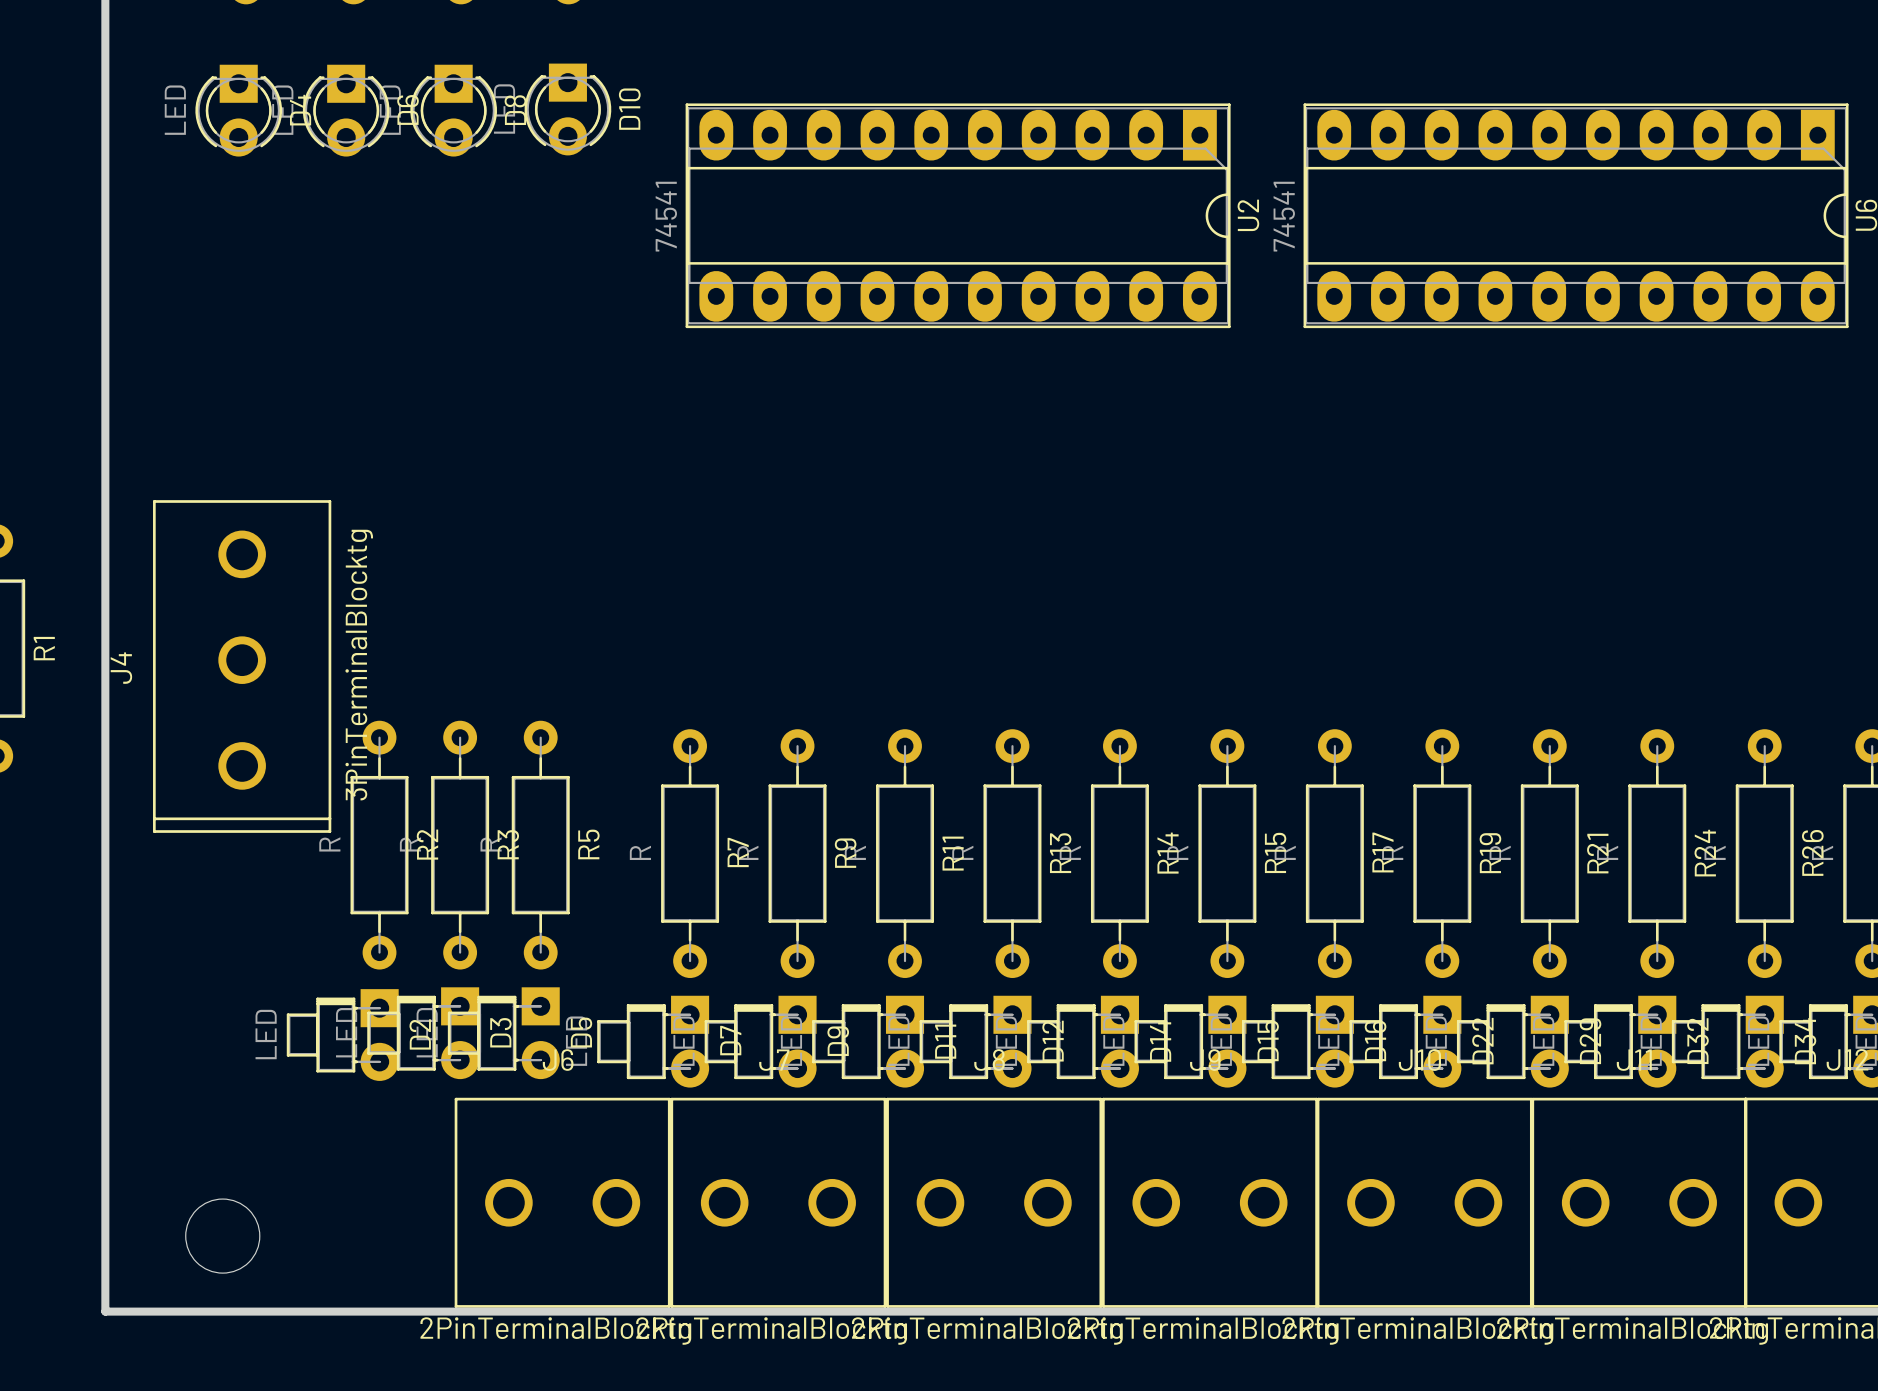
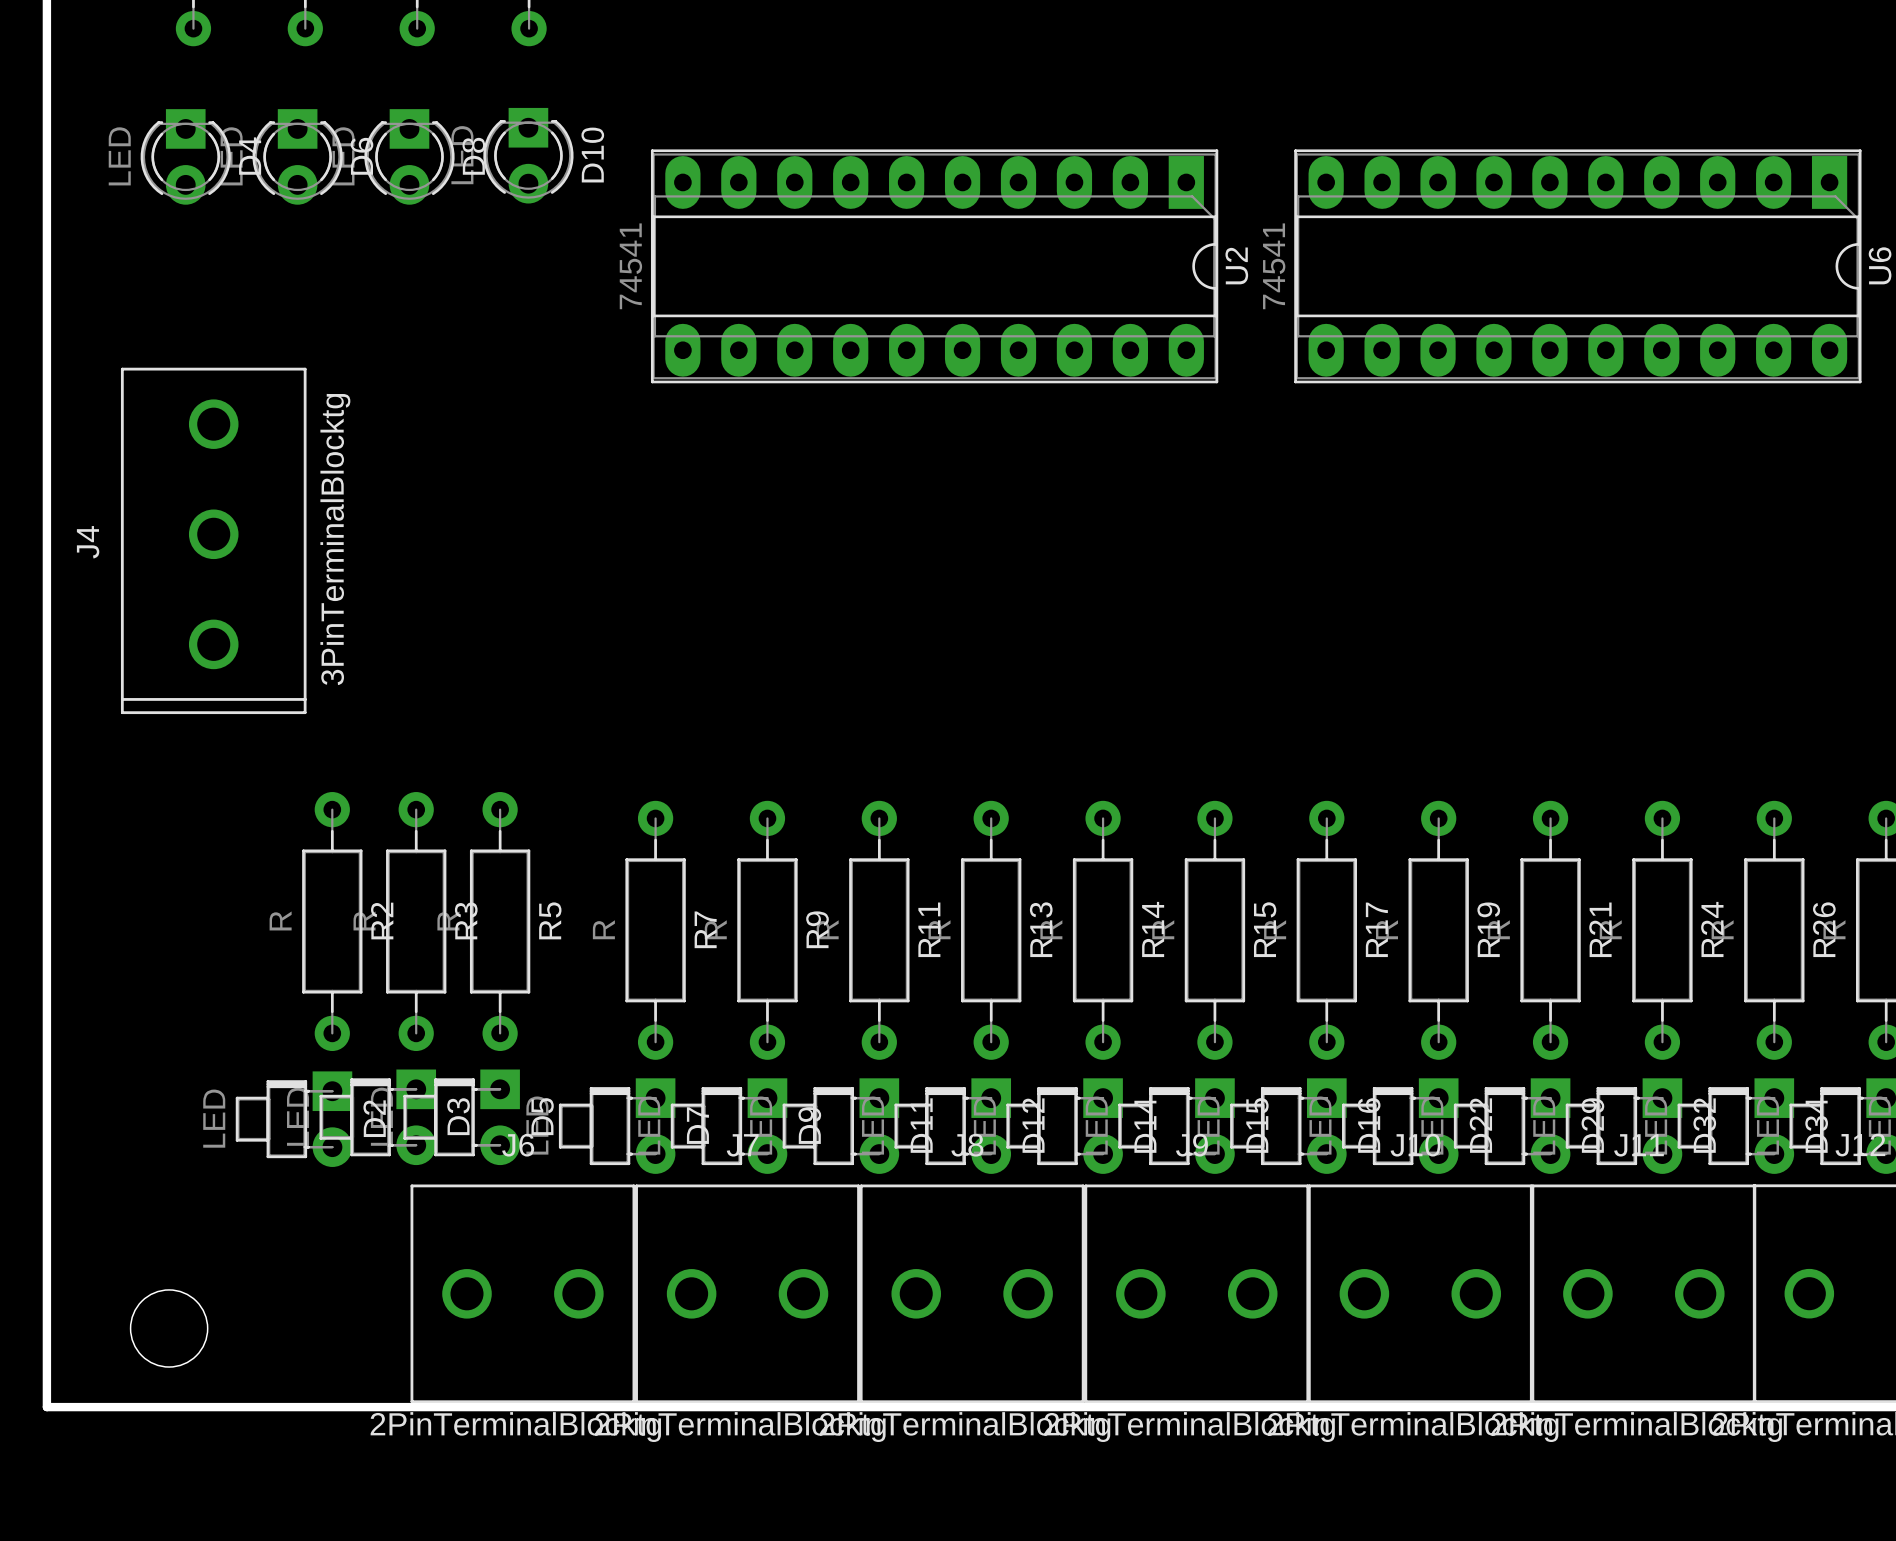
J4 position: (242, 666) -> (213, 540)

